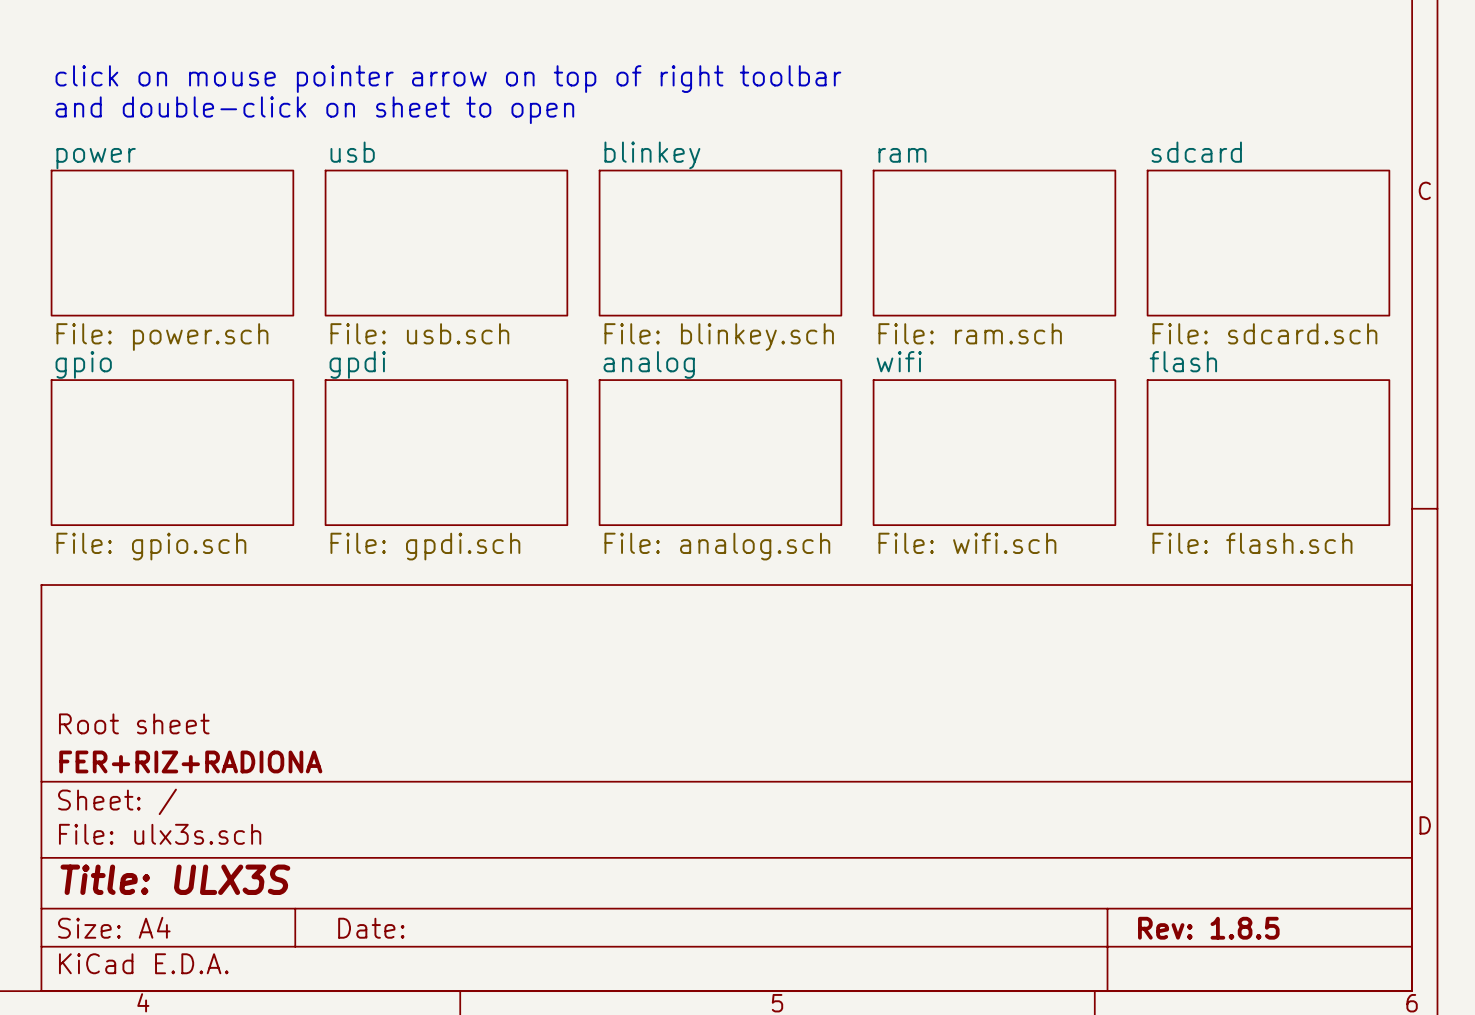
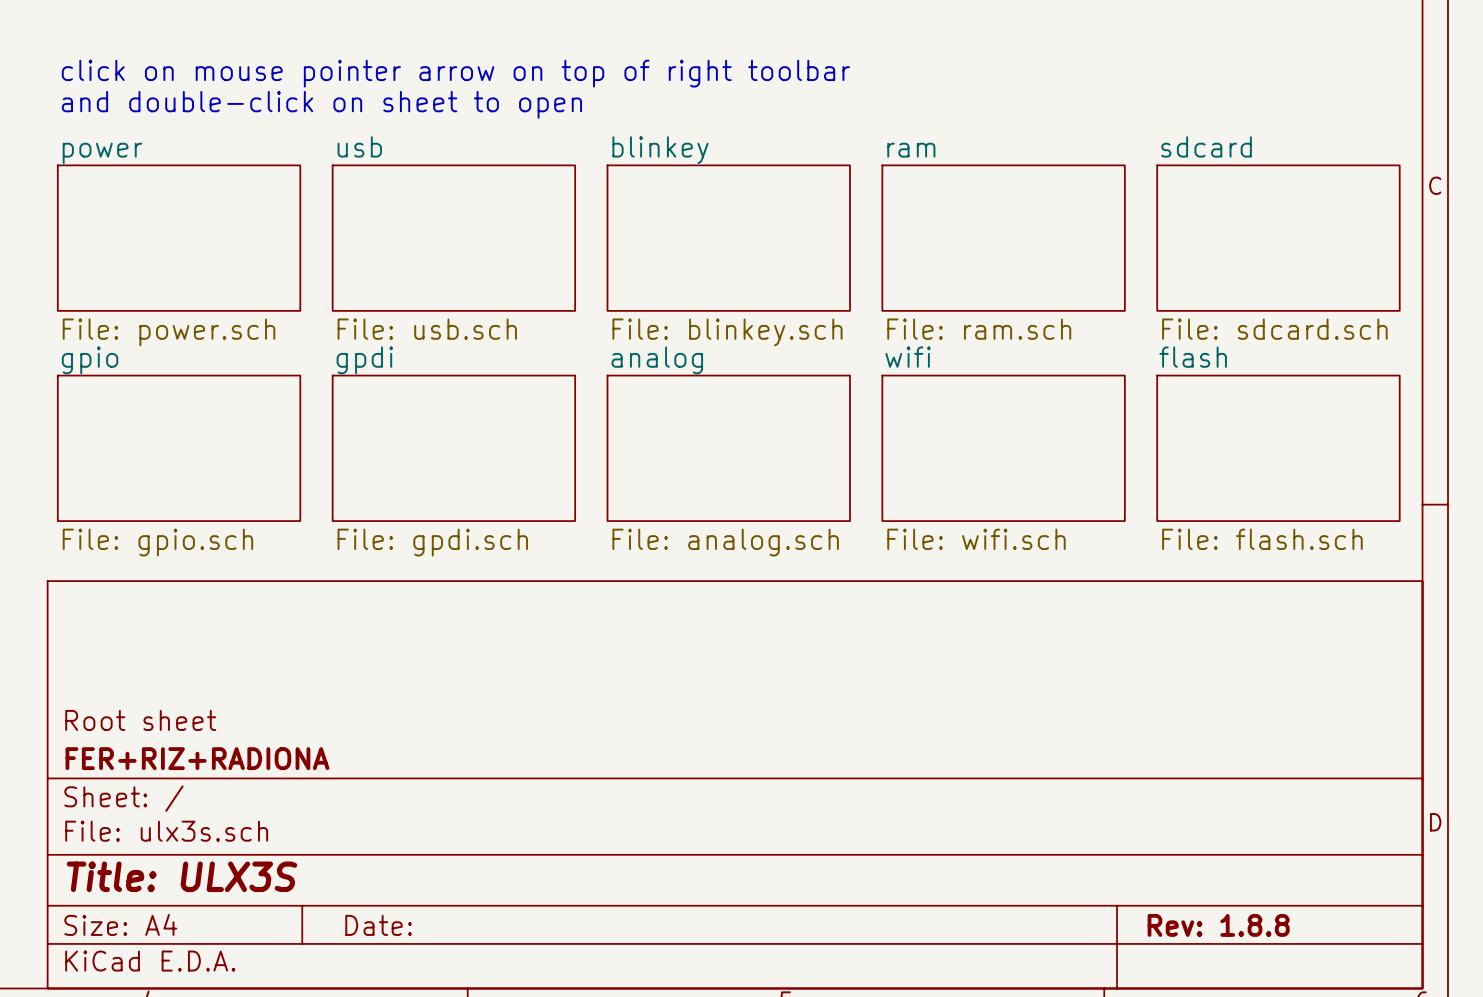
title block: Rev: 1.8.5 (1208, 928) -> Rev: 1.8.8 (1218, 925)

